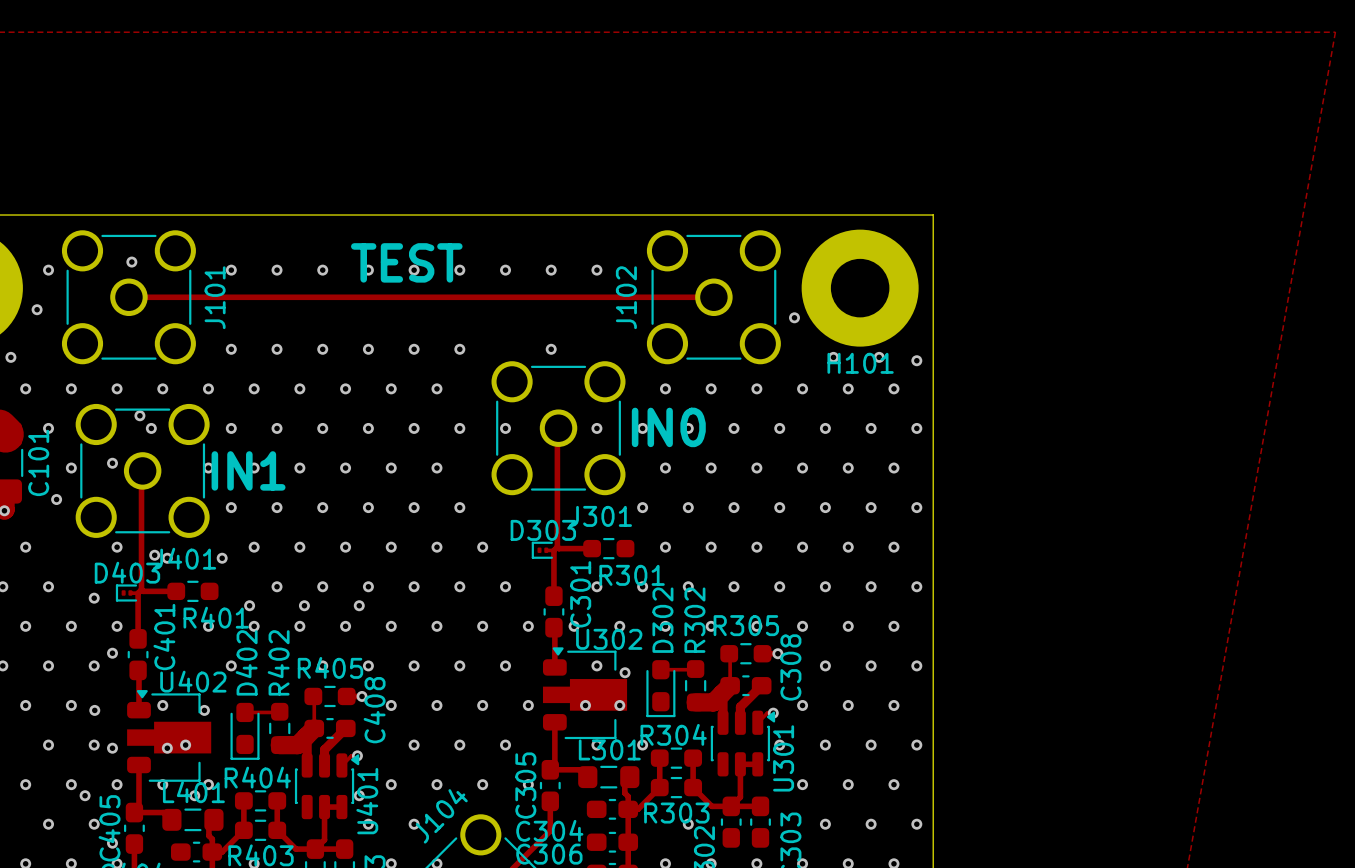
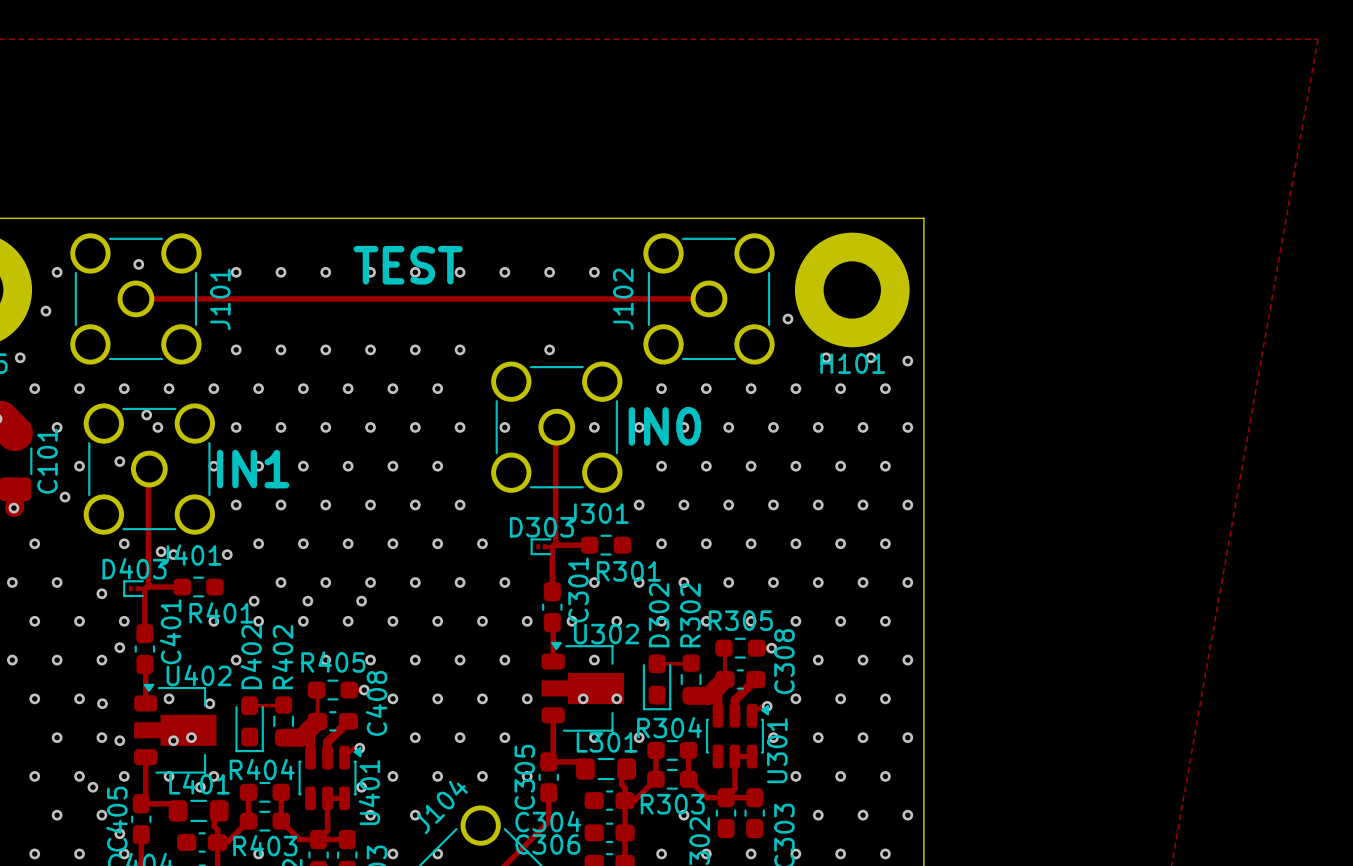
via: (625, 672) -> none

